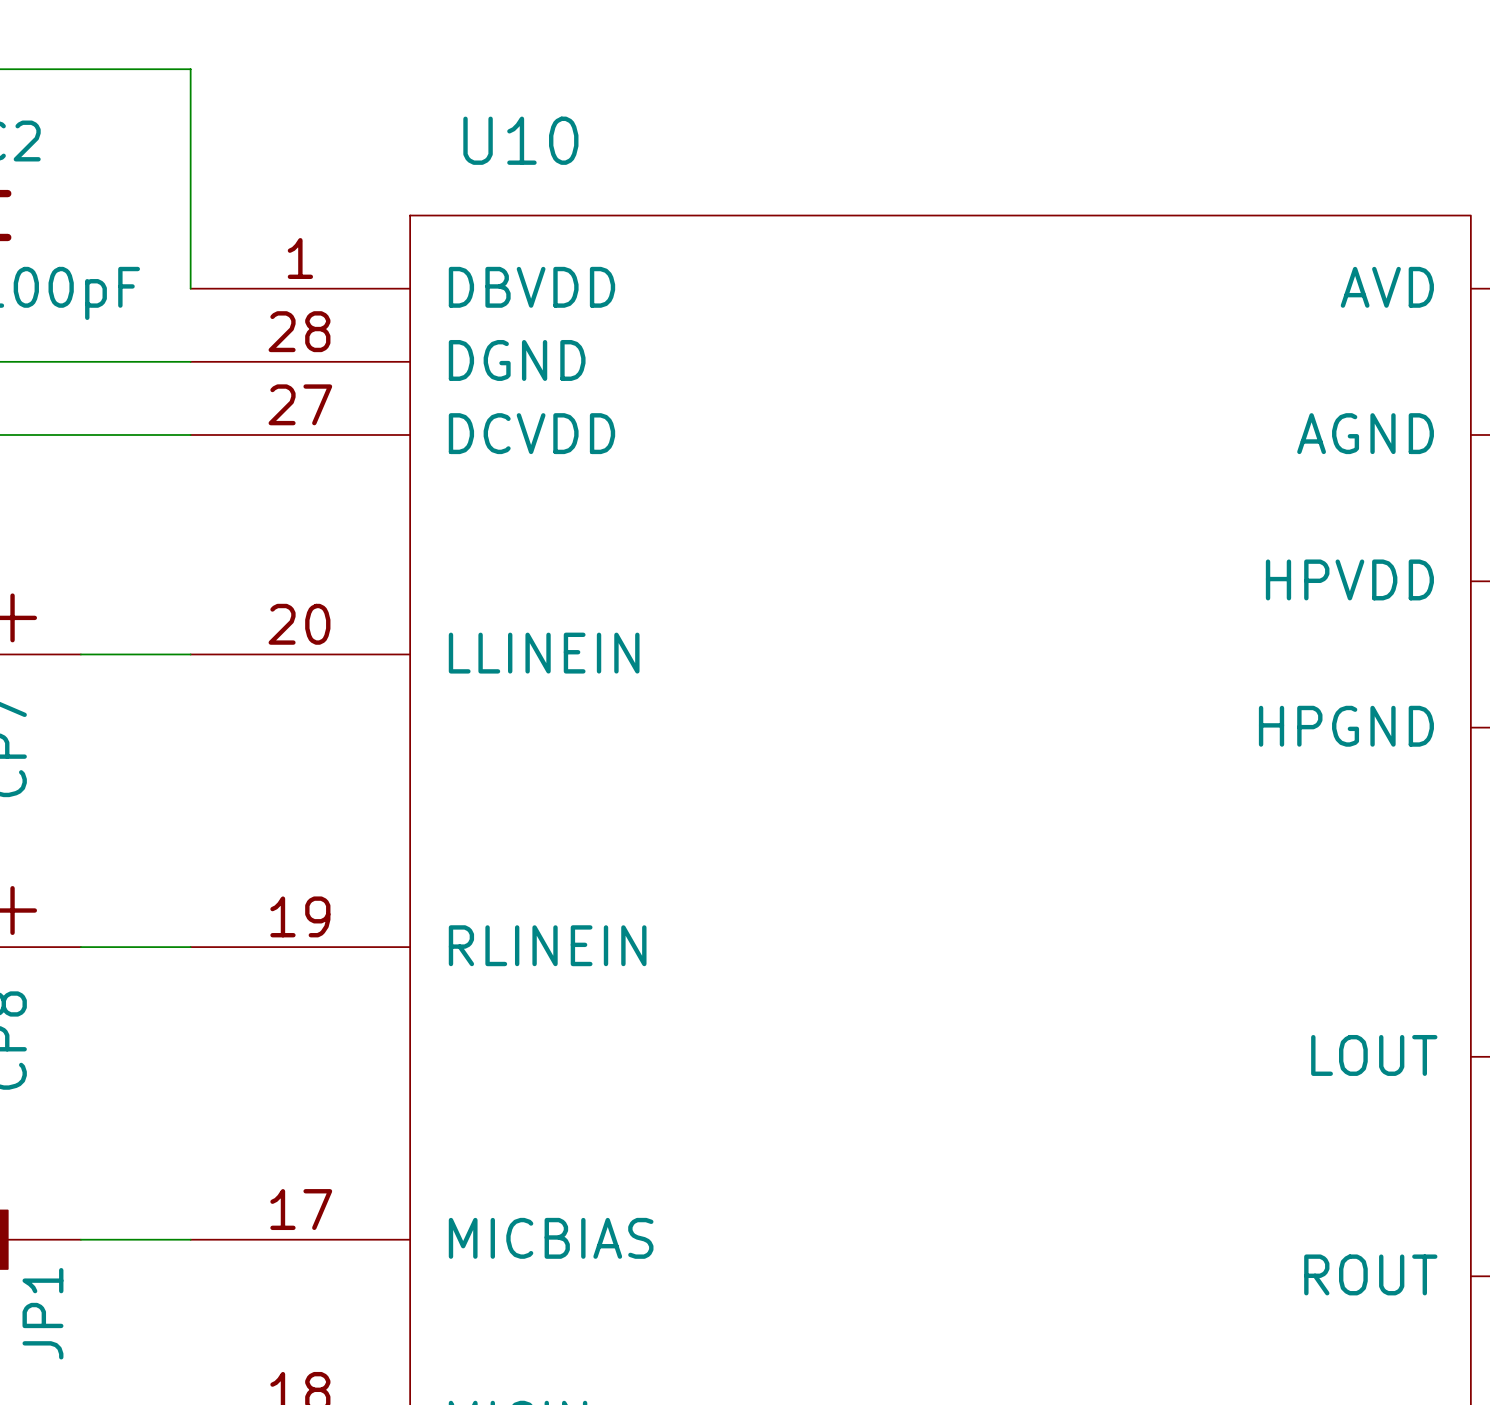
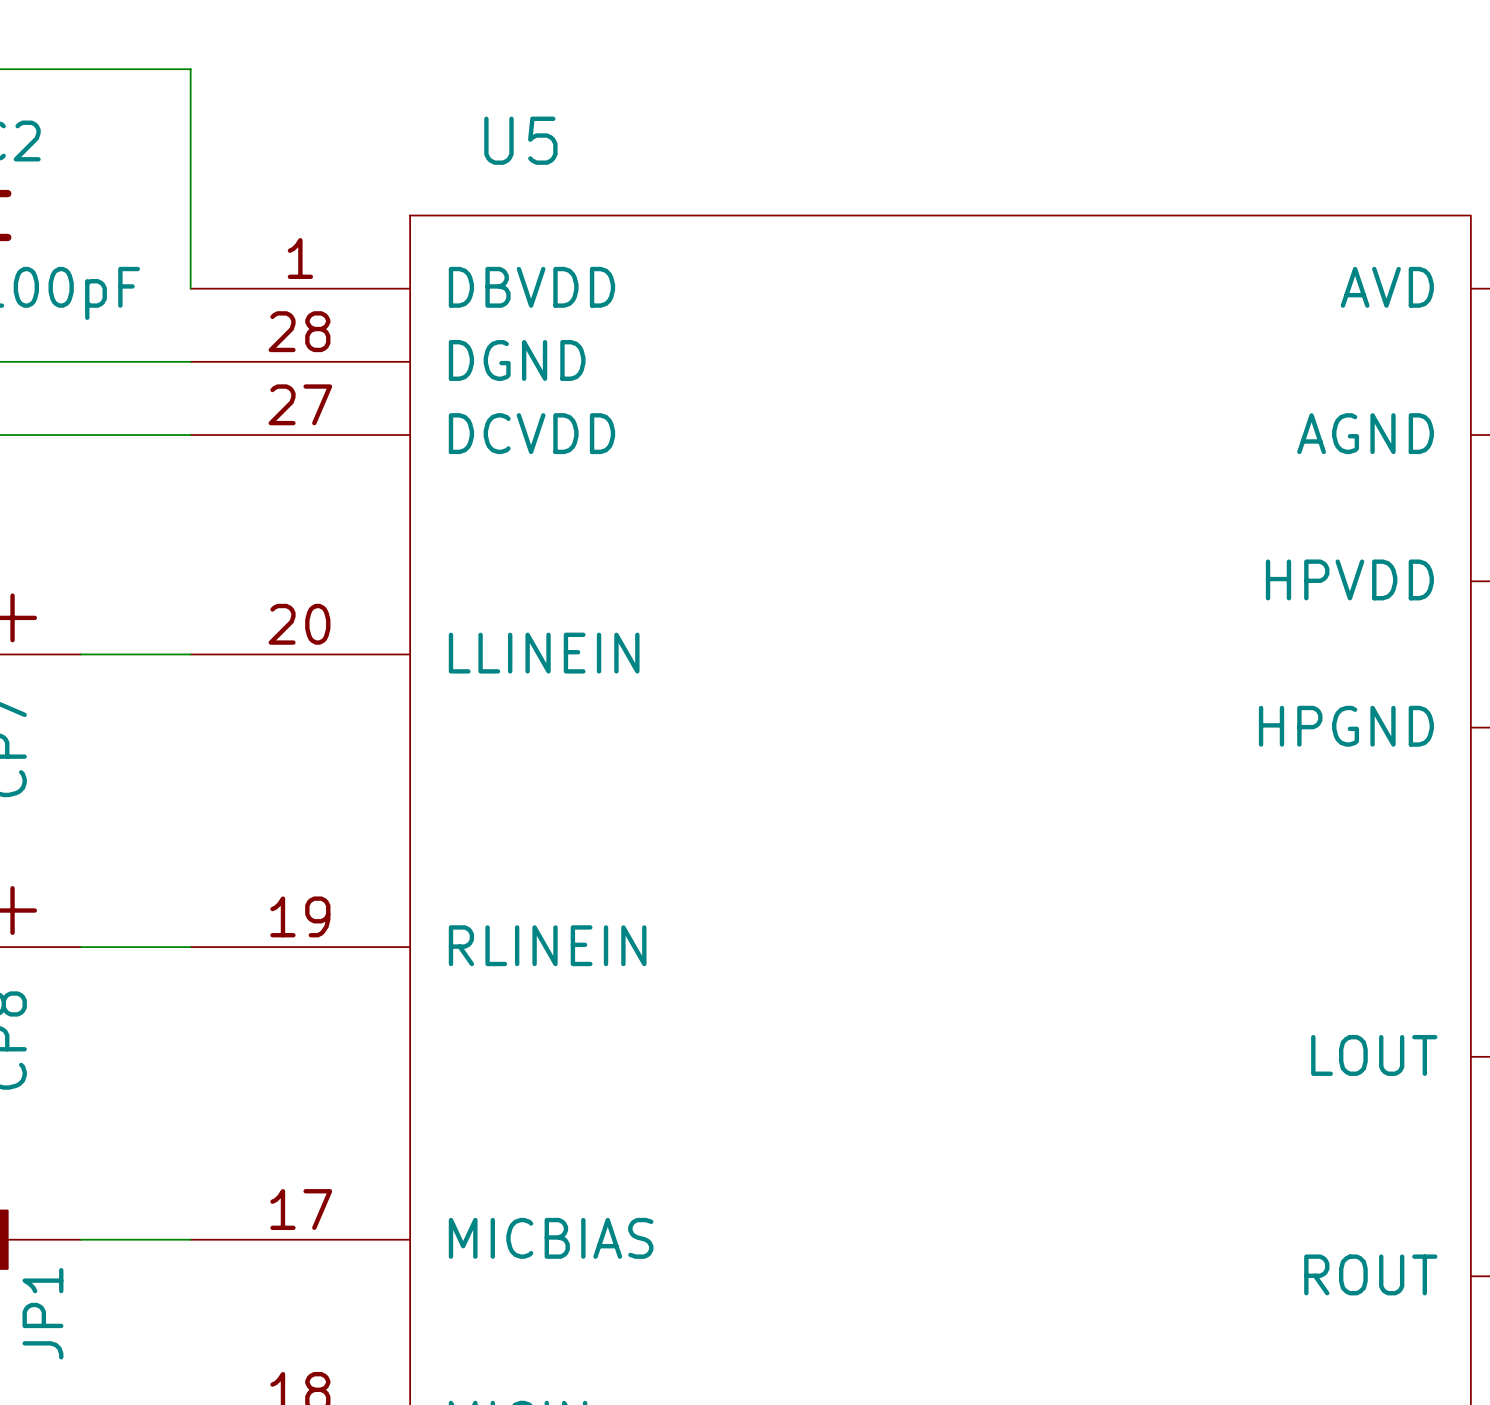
U10 name: U10 (520, 140) -> U5 (520, 140)

